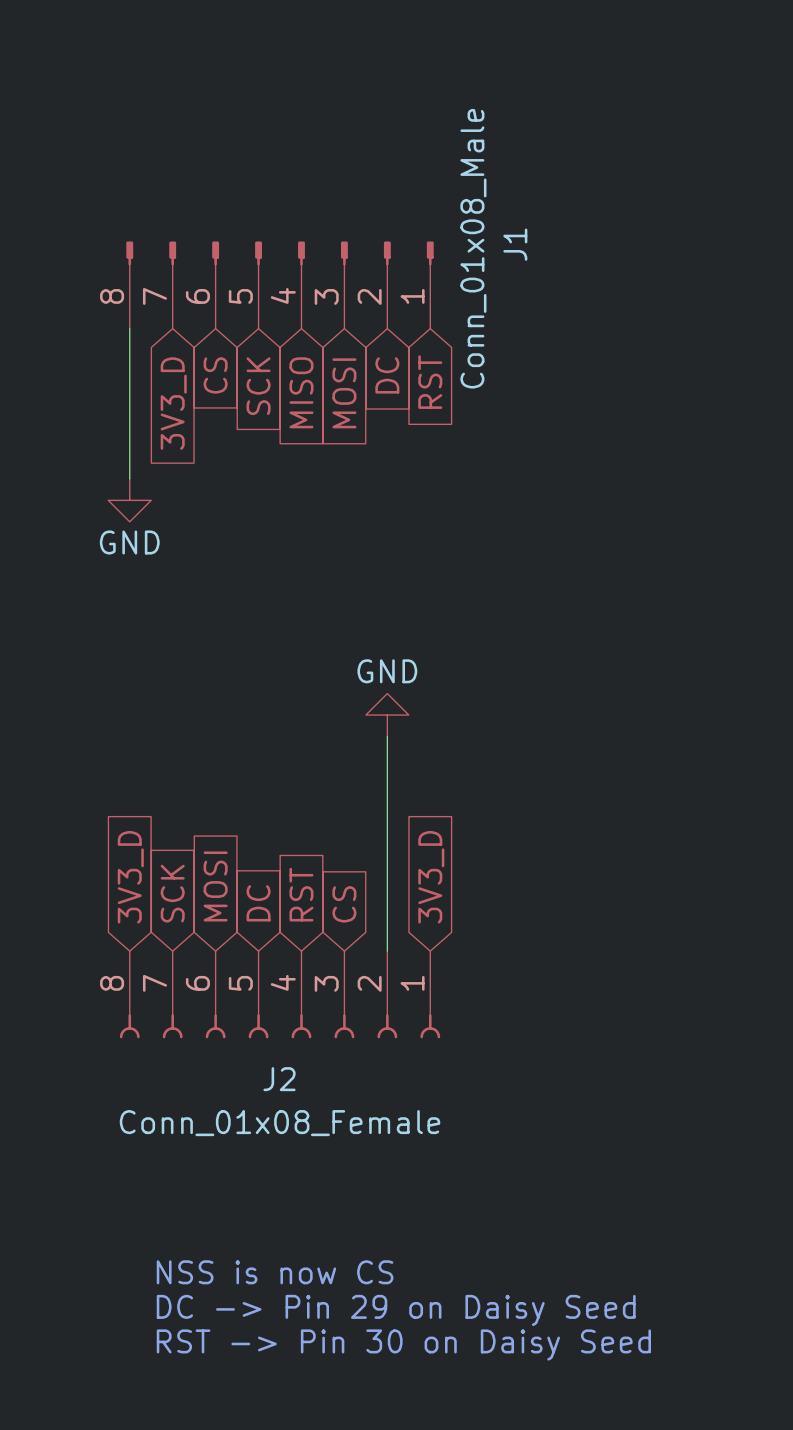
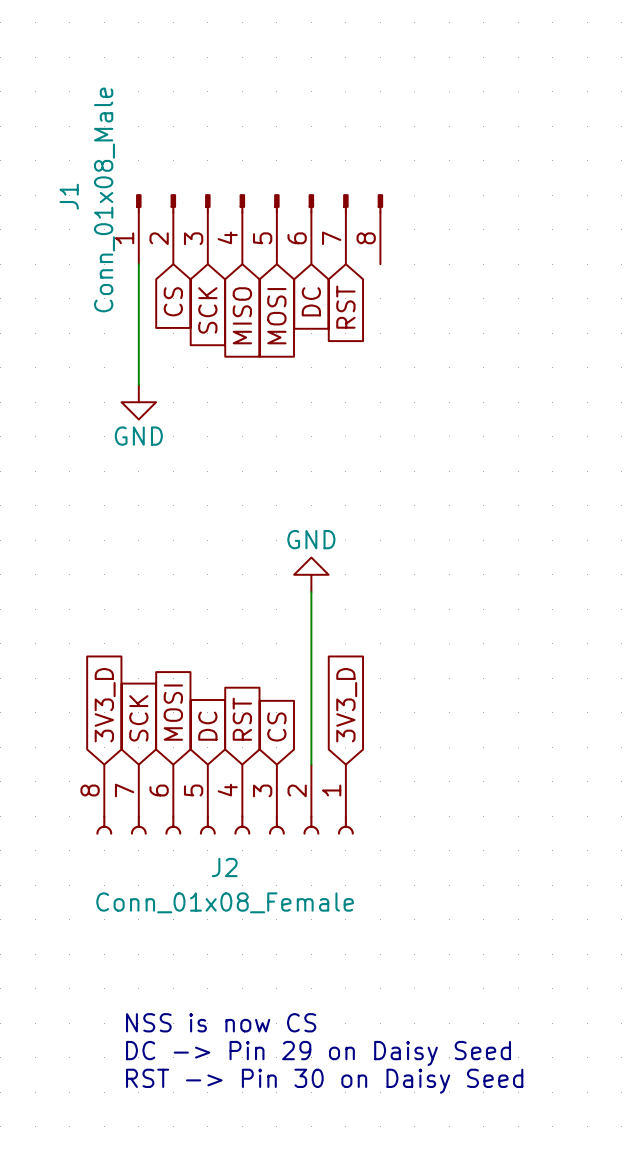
J1 flip: as is (280, 253) -> left-right (259, 203)
wire: (129, 328) (129, 478) -> (138, 264) (138, 384)
global label: 3V3_D (173, 403) -> none
power symbol position: GND (129, 500) -> GND (138, 402)

